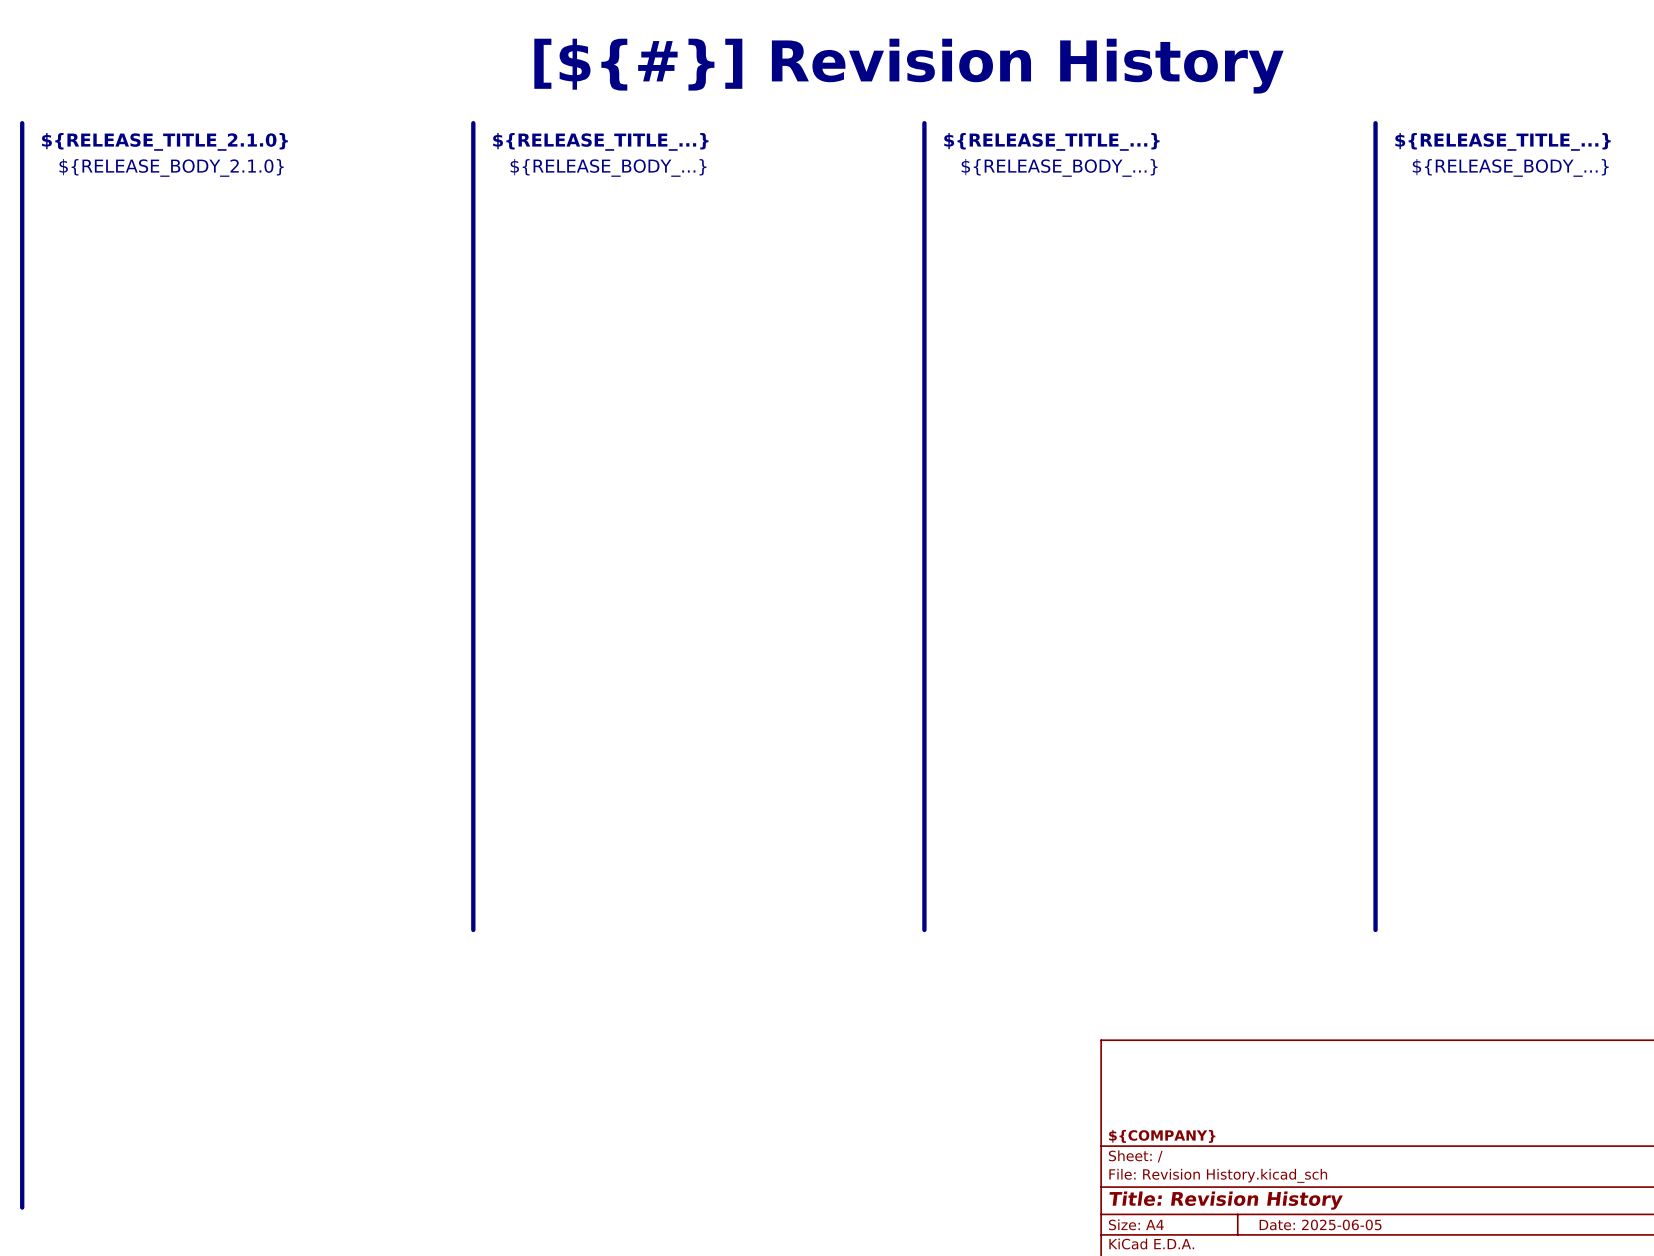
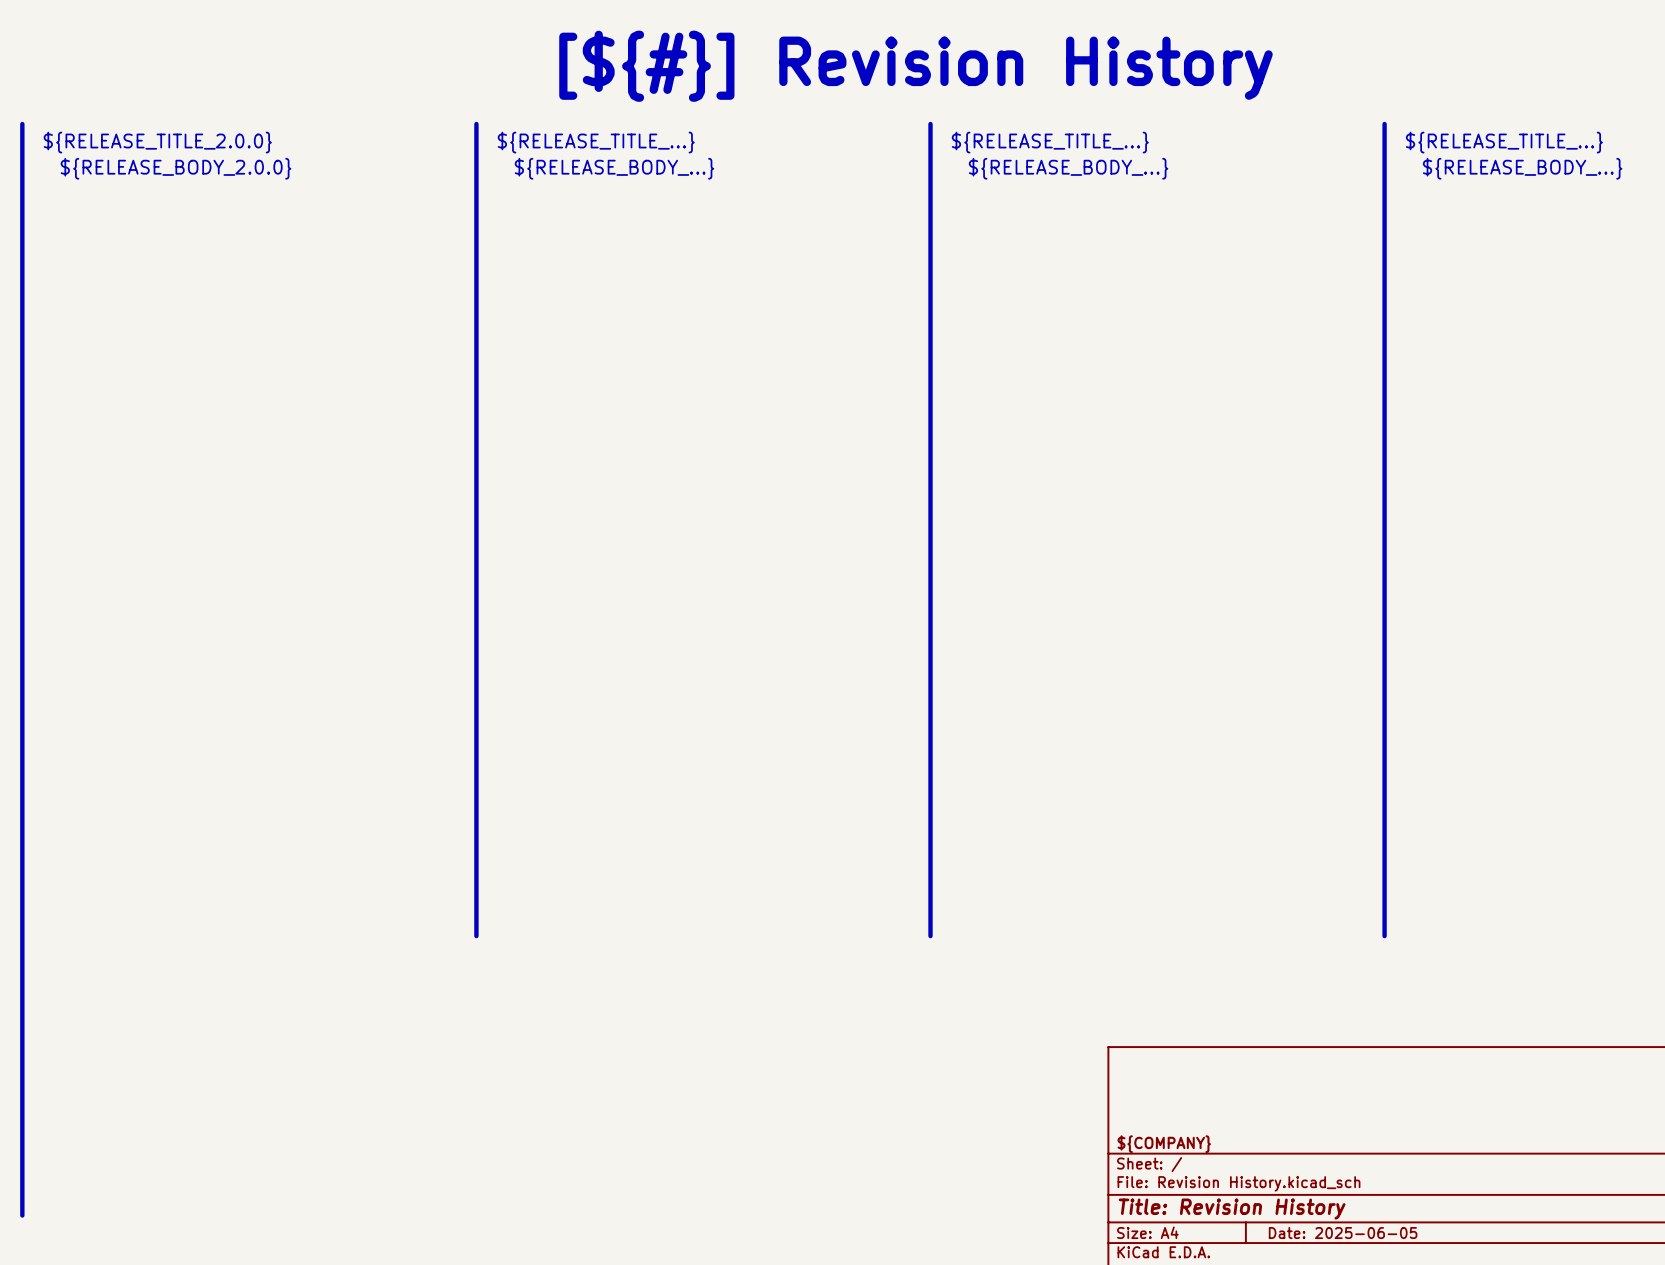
text: ${RELEASE_TITLE_2.1.0} (164, 141) -> ${RELEASE_TITLE_2.0.0} (157, 142)
text: ${RELEASE_BODY_2.1.0} (171, 167) -> ${RELEASE_BODY_2.0.0} (176, 168)

